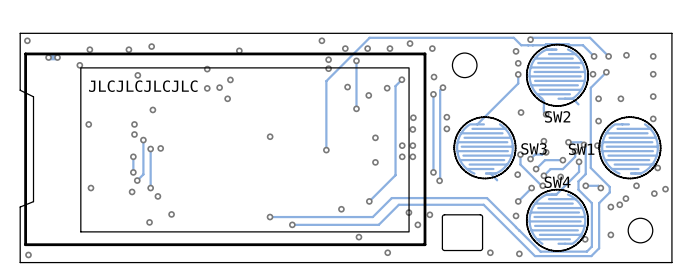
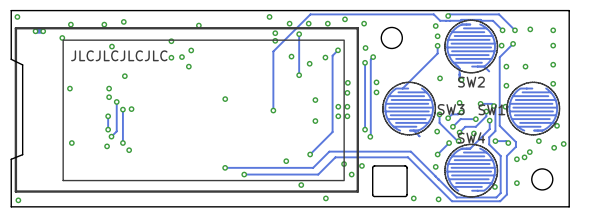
via: (171, 214) -> none
via: (149, 222) -> none

